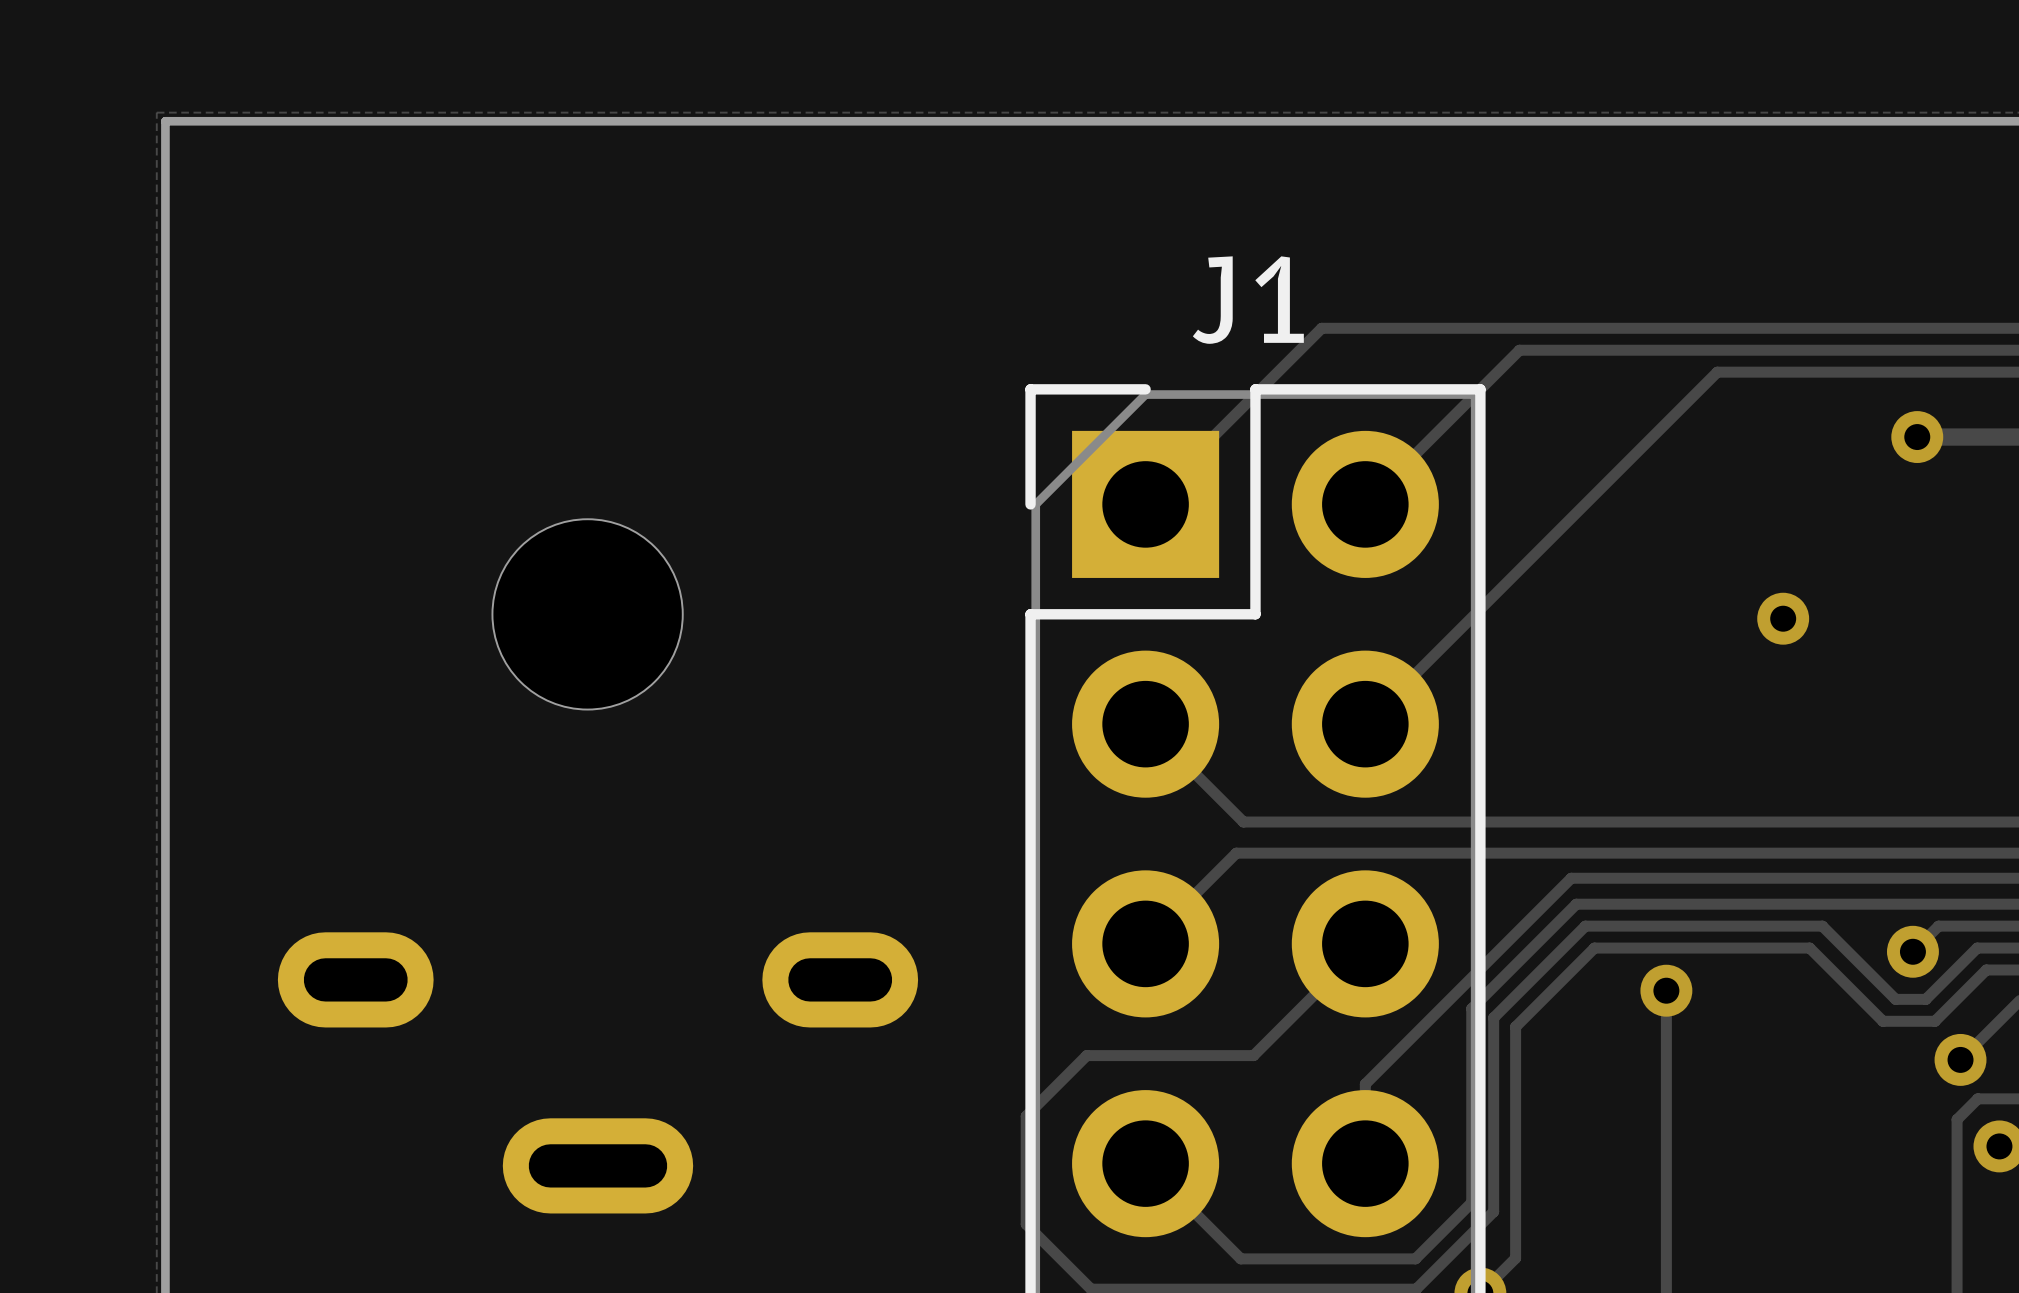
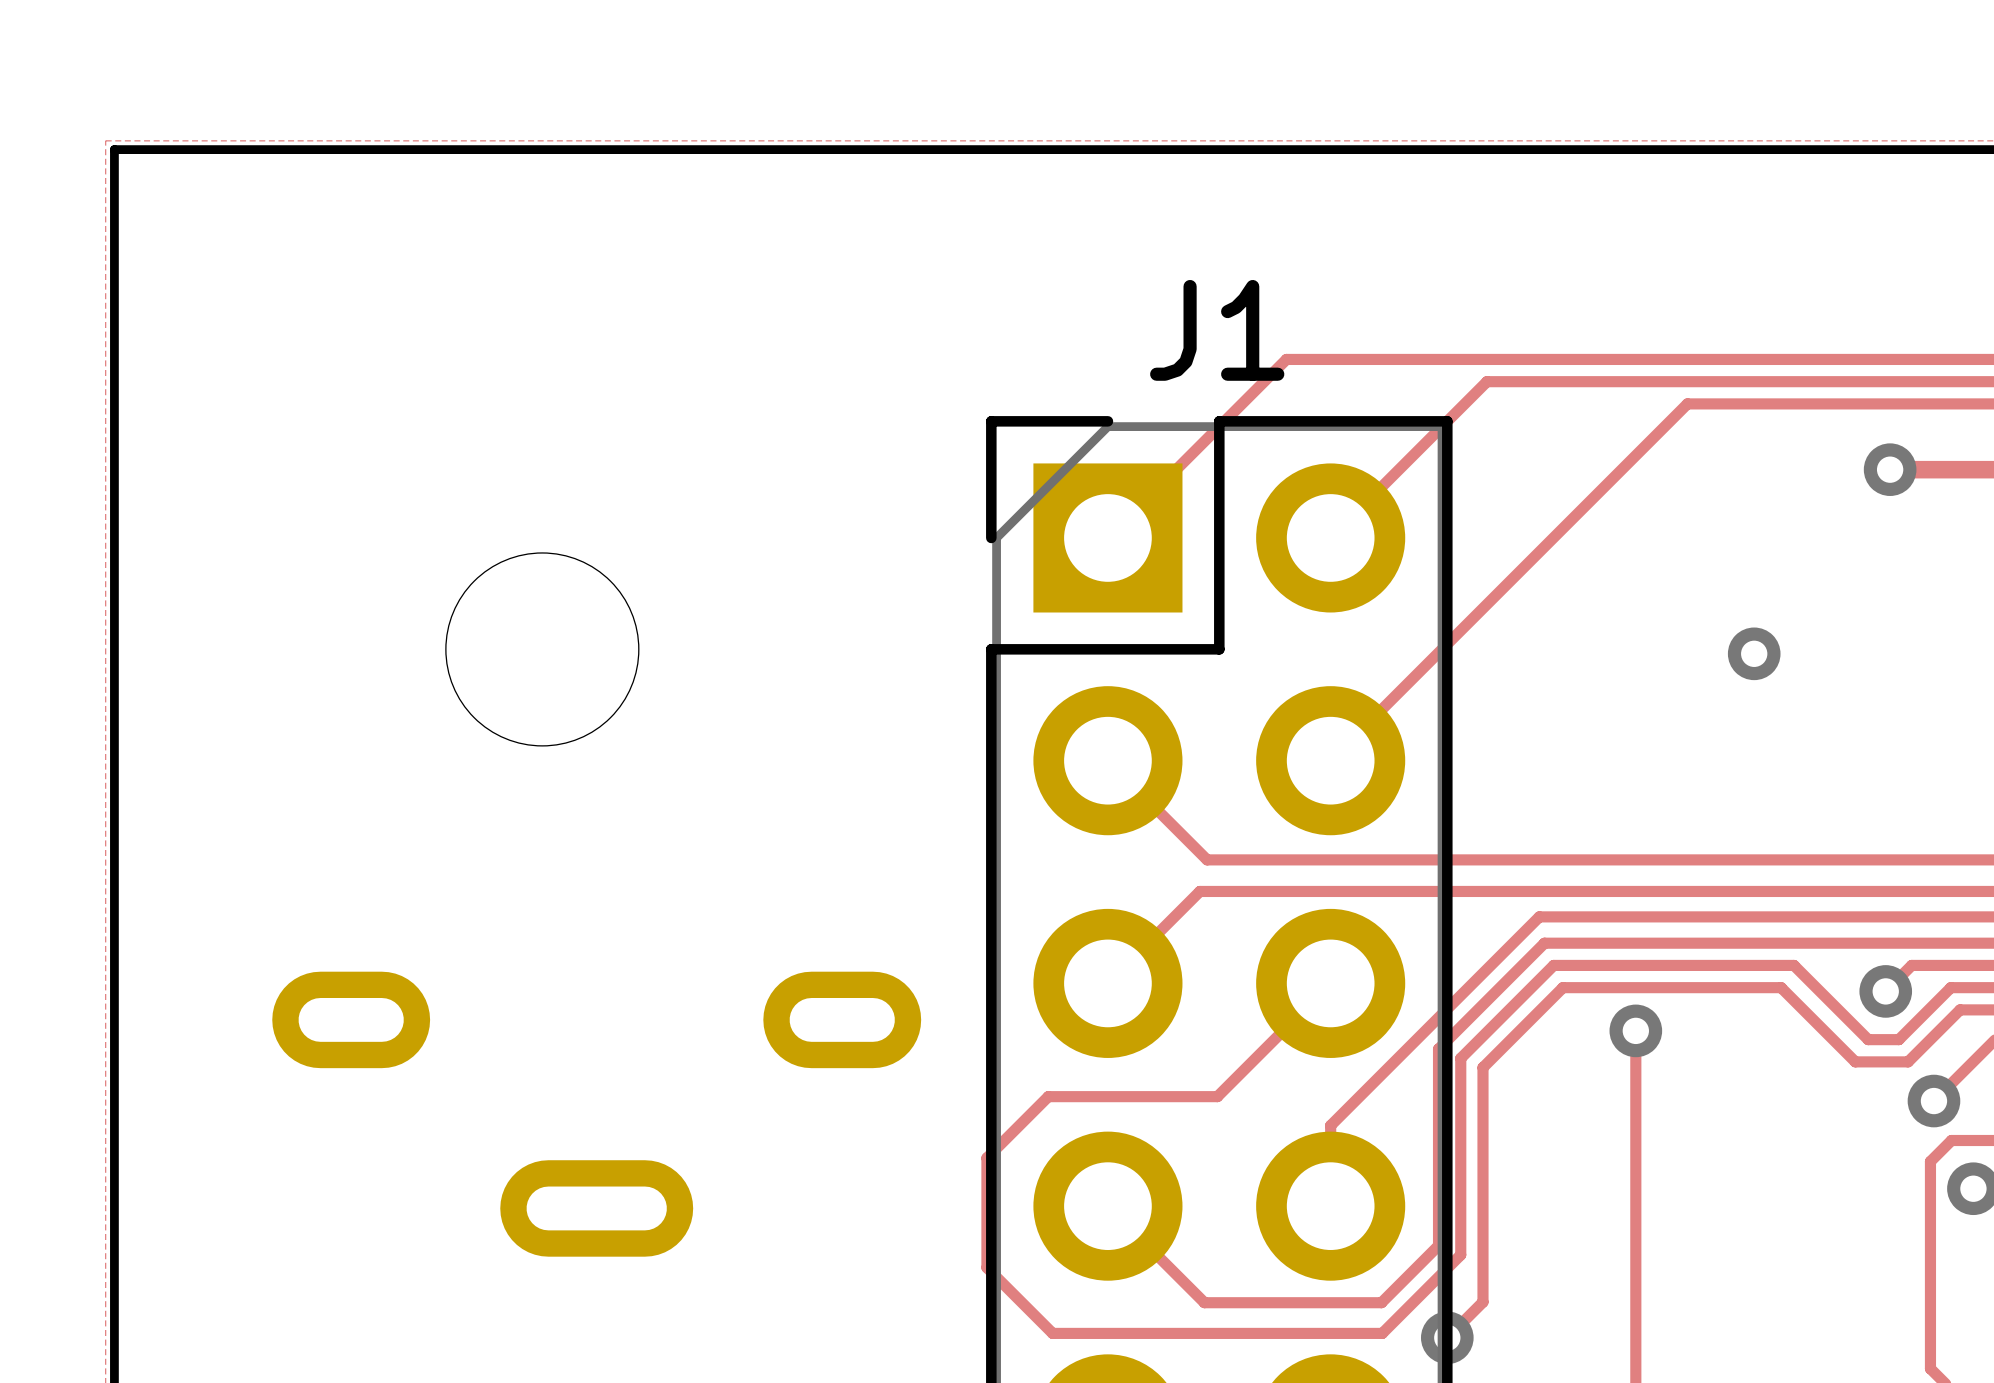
part position: (597, 1072) -> (596, 1114)

